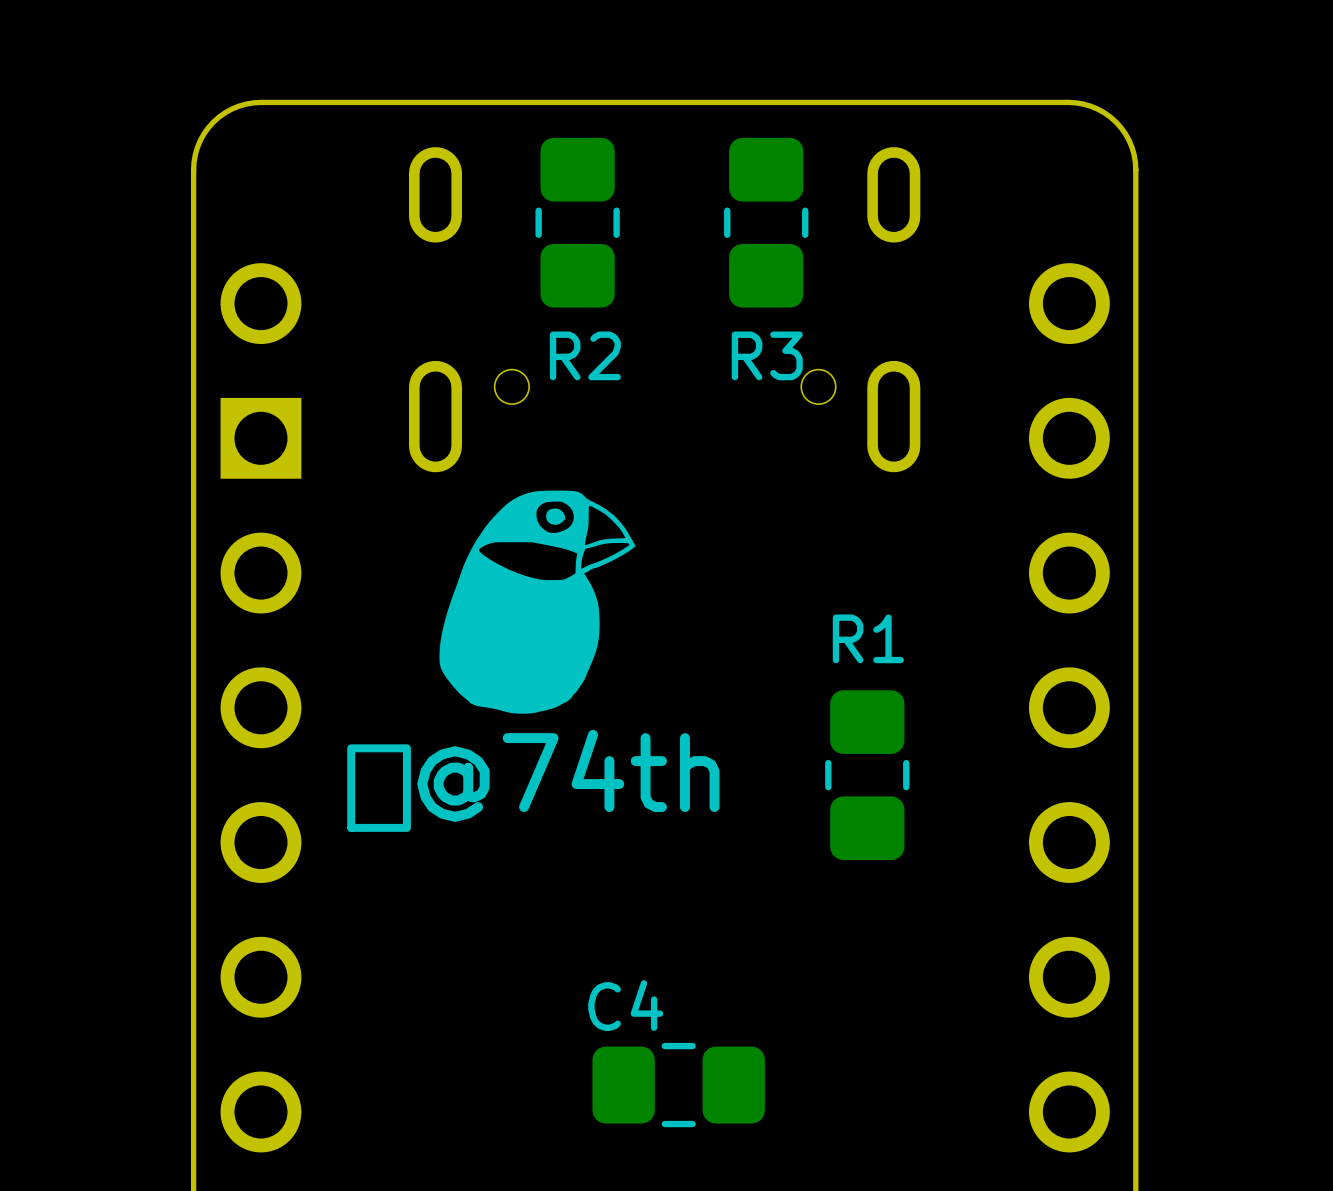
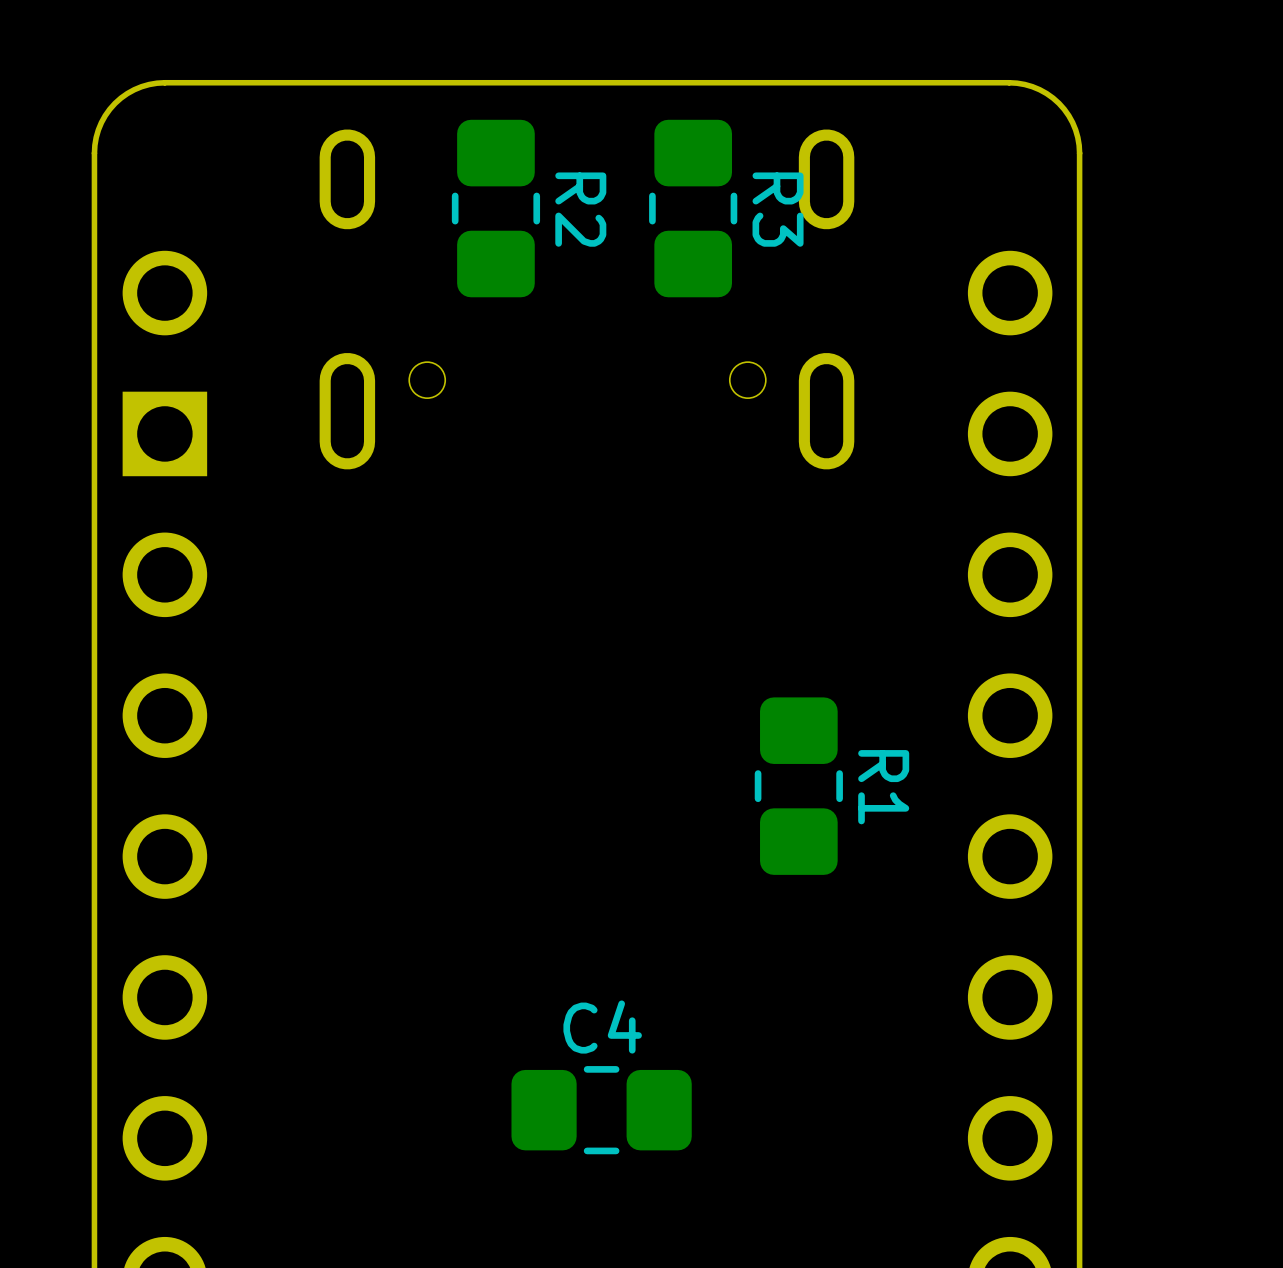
R2 name rotation: 0° (585, 355) -> 90° clockwise (580, 209)
R2 name position: R2 (585, 355) -> R2 (580, 209)
R3 name rotation: 0° (767, 355) -> 90° clockwise (778, 209)
R3 name position: R3 (767, 355) -> R3 (778, 209)
drawing: [439, 490, 636, 714] -> none
R1 name rotation: 0° (868, 638) -> 90° clockwise (883, 787)
R1 name position: R1 (868, 638) -> R1 (883, 787)
C4 name position: C4 (625, 1005) -> C4 (602, 1027)

